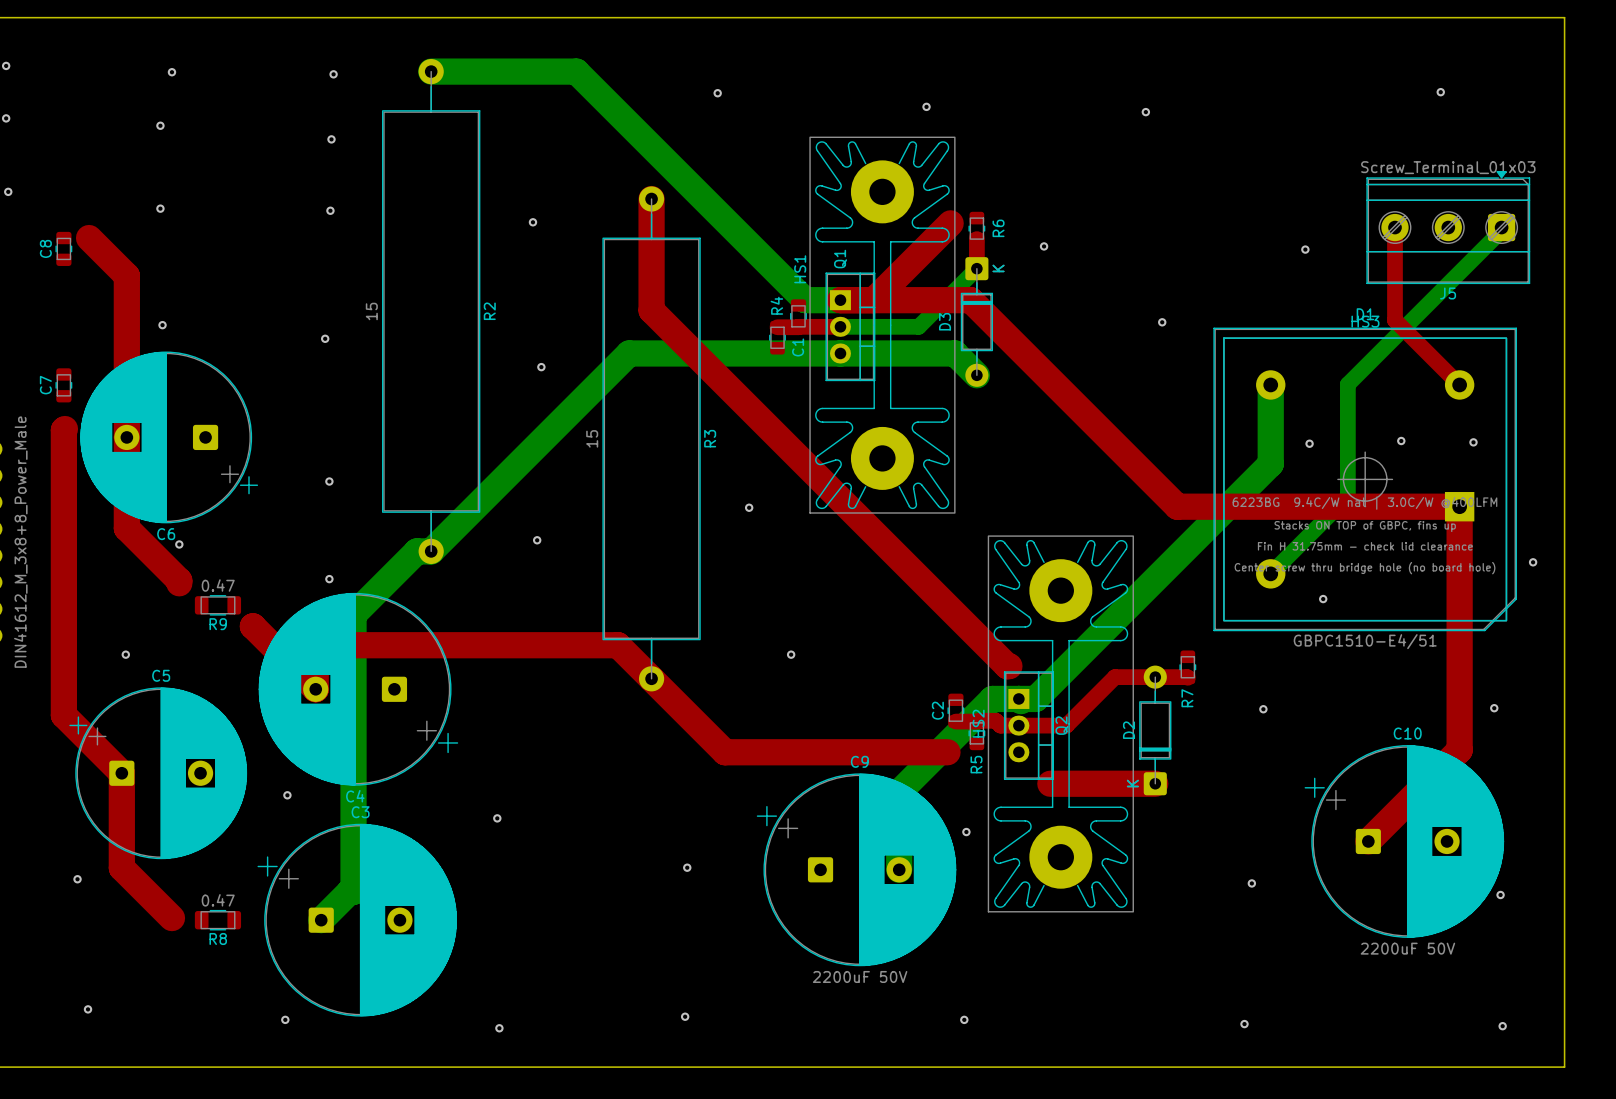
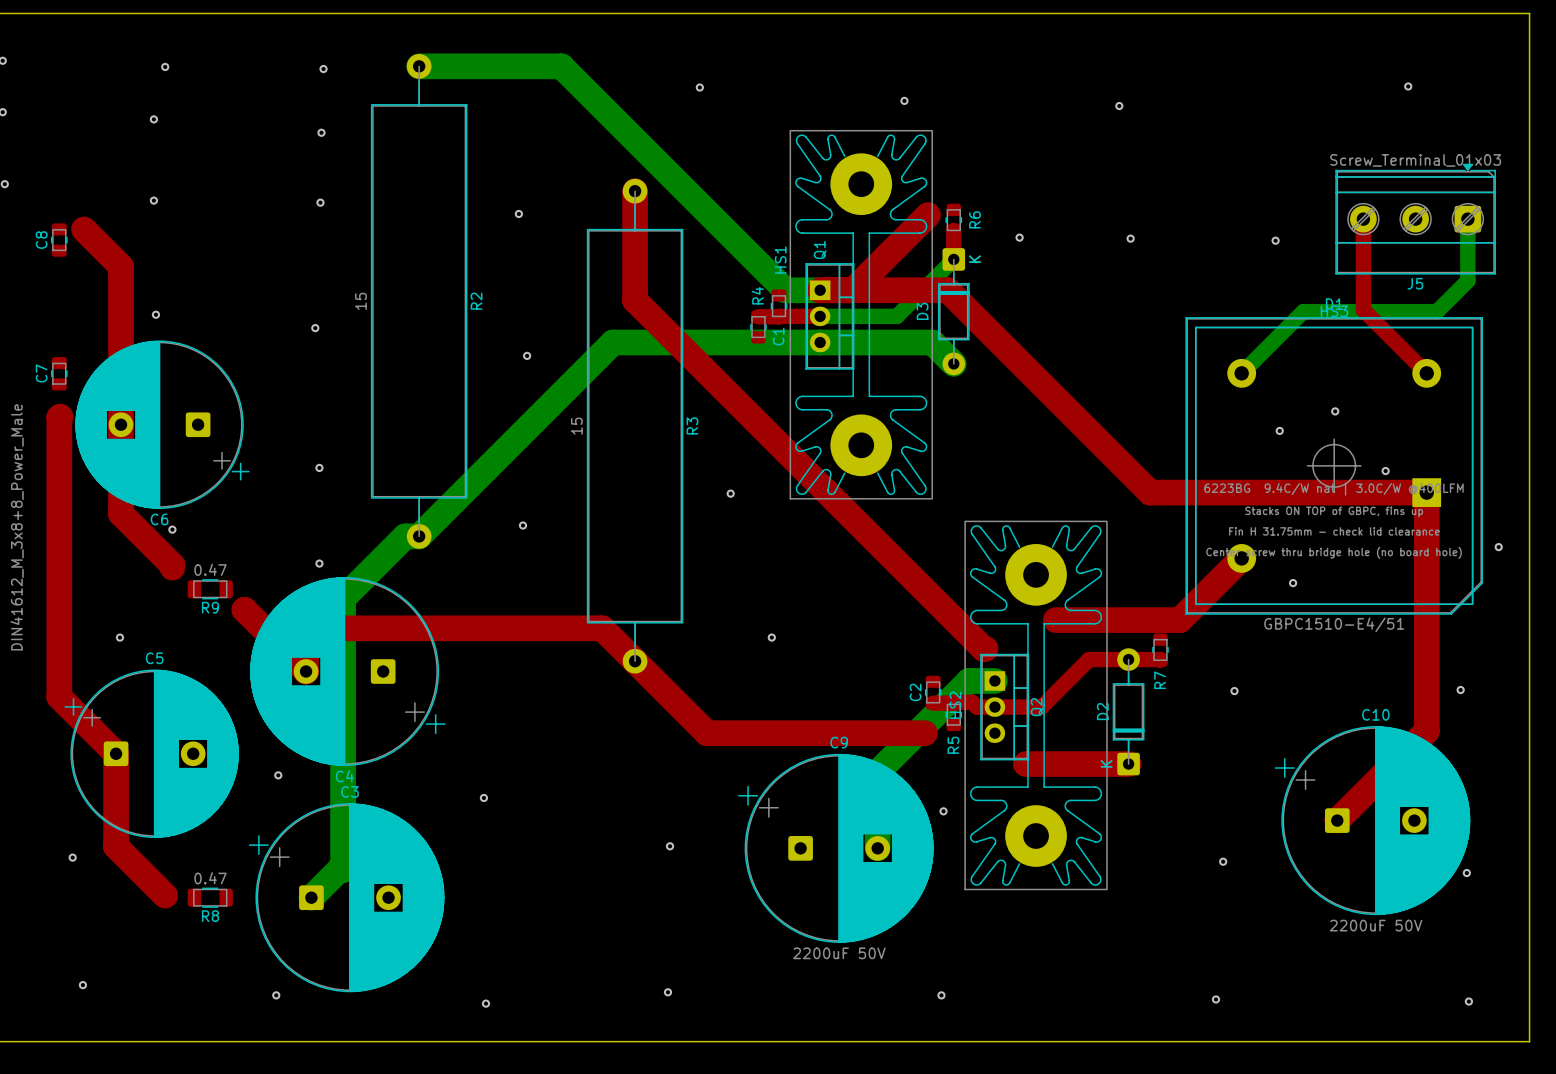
bottom track: (1501, 230) (1347, 384) (1347, 496) (1270, 573) -> (1467, 222) (1467, 280) (1437, 311) (1303, 311) (1241, 373)
via: none -> (1130, 238)
via: (1162, 322) -> none
bottom track: (1270, 384) (1270, 463) (1035, 698) (1018, 698) (1021, 701) -> none
via: none -> (1335, 411)
via: (1401, 441) -> none
via: (1473, 442) -> none
via: none -> (1385, 471)
top track: none -> (1241, 558) (1179, 620) (1055, 620)

